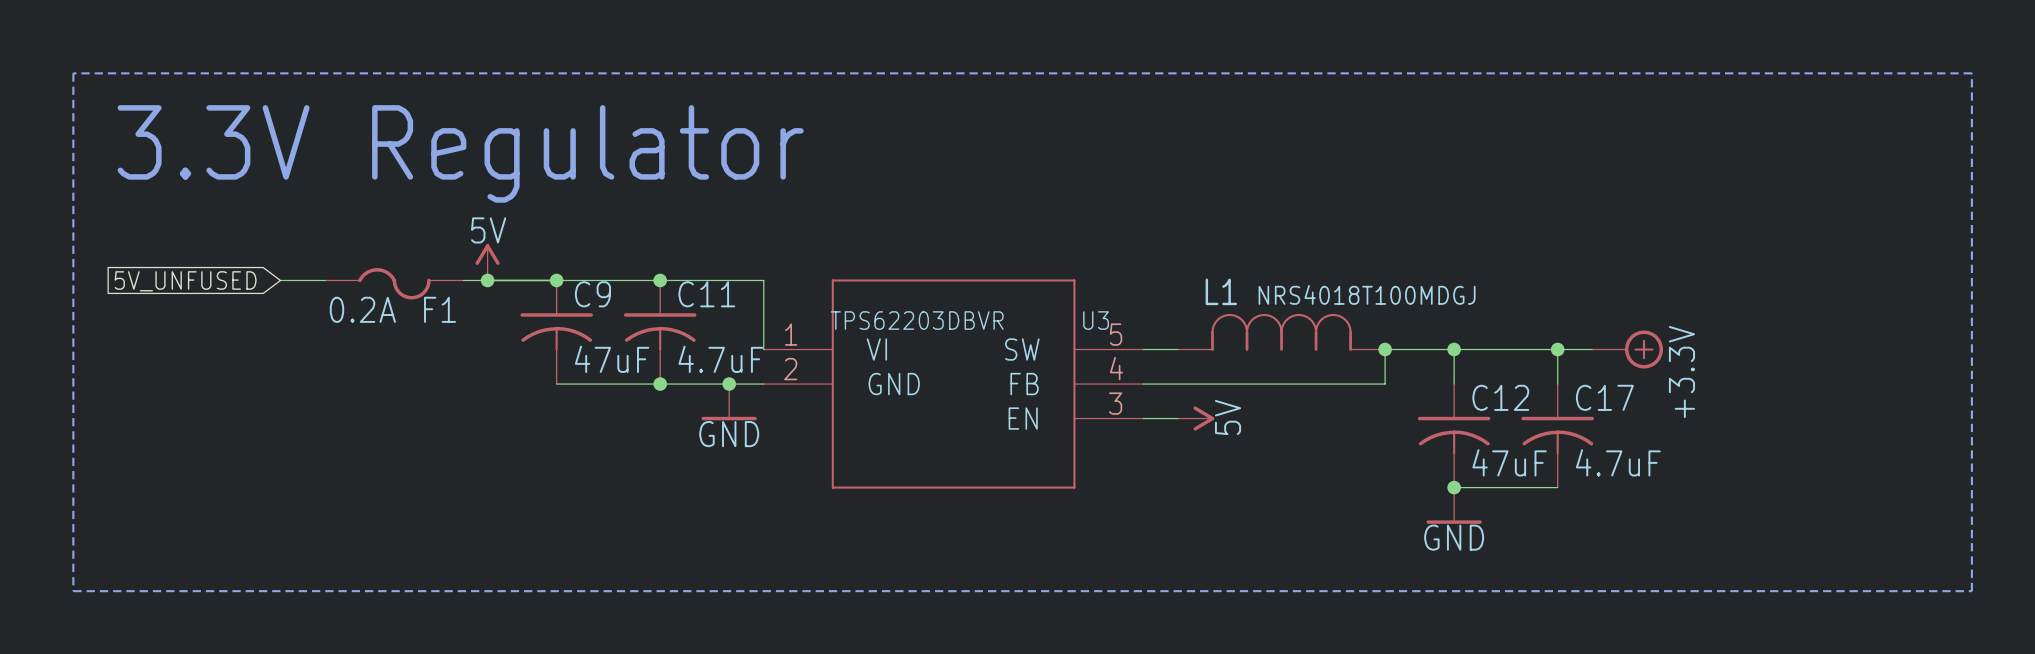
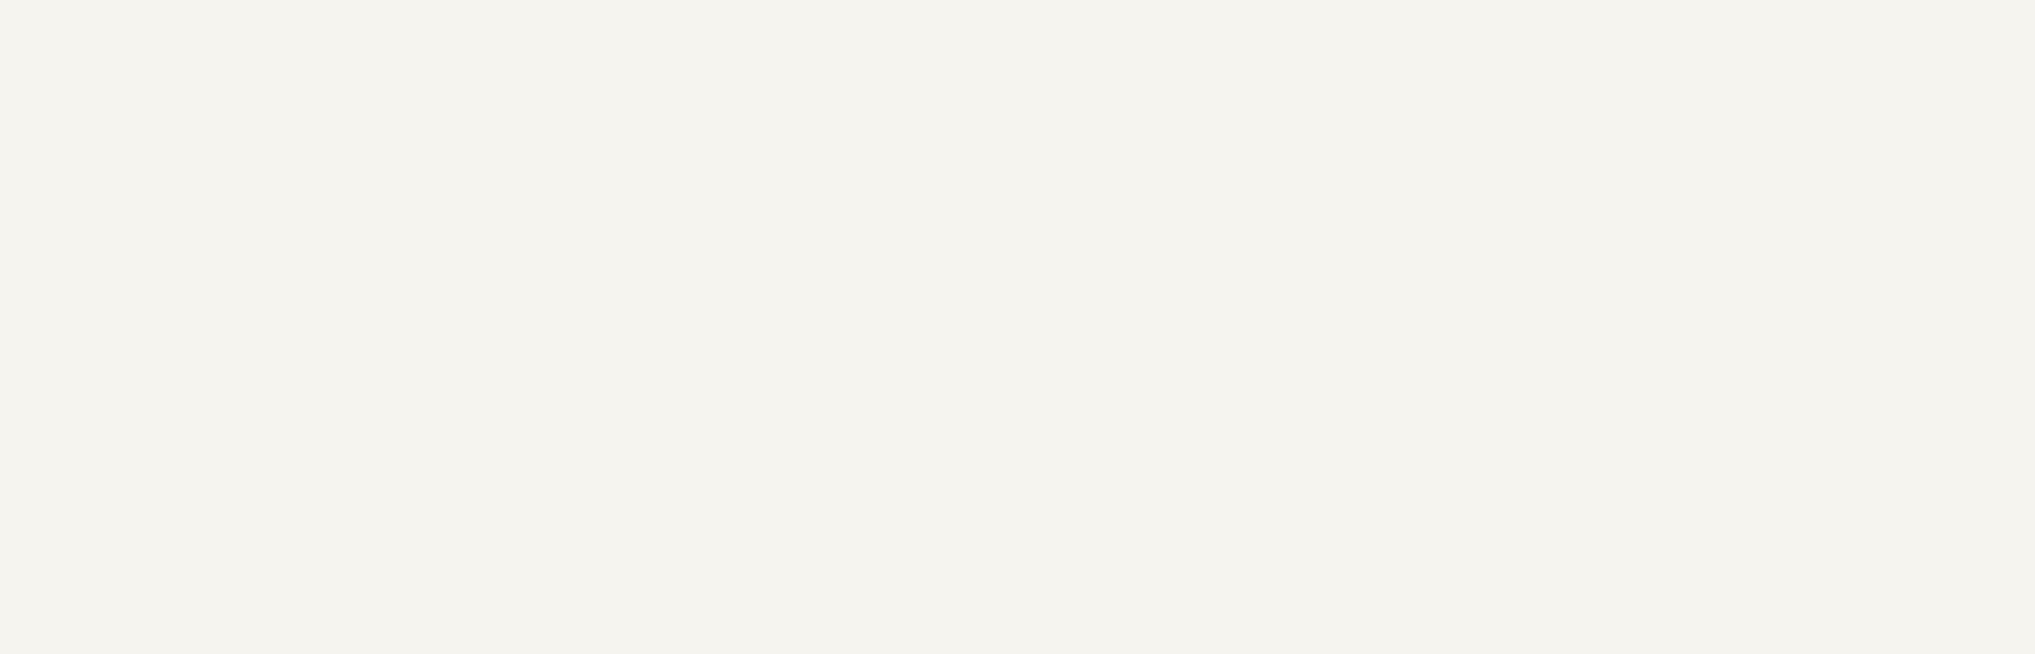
line: (73, 73) (73, 591) (1971, 591) (1971, 73) (73, 73) -> none
text: 3.3V Regulator (460, 153) -> none
power symbol: 5V (487, 262) -> none
wire: (280, 280) (325, 280) -> none
wire: (463, 280) (763, 280) (763, 349) -> none
junction: (487, 280) -> none
junction: (556, 280) -> none
junction: (660, 280) -> none
global label: 5V_UNFUSED (185, 281) -> none
F1: 0.2A (394, 283) -> none
C9: 47uF (556, 332) -> none
C11: 4.7uF (660, 332) -> none
L1: NRS4018T100MDGJ (1281, 332) -> none
wire: (1143, 349) (1177, 349) -> none
junction: (1385, 349) -> none
wire: (1454, 349) (1454, 384) -> none
junction: (1454, 349) -> none
wire: (1557, 349) (1557, 384) -> none
junction: (1557, 349) -> none
wire: (1592, 349) (1385, 349) (1385, 384) (1143, 384) -> none
power symbol: +3.3V (1627, 349) -> none
wire: (556, 384) (763, 384) -> none
junction: (660, 384) -> none
junction: (729, 384) -> none
U3: TPS62203DBVR (953, 384) -> none
power symbol: GND (729, 402) -> none
wire: (1143, 418) (1177, 418) -> none
power symbol: 5V (1196, 418) -> none
C12: 47uF (1454, 435) -> none
C17: 4.7uF (1557, 435) -> none
wire: (1454, 487) (1557, 487) -> none
junction: (1454, 487) -> none
power symbol: GND (1454, 505) -> none

